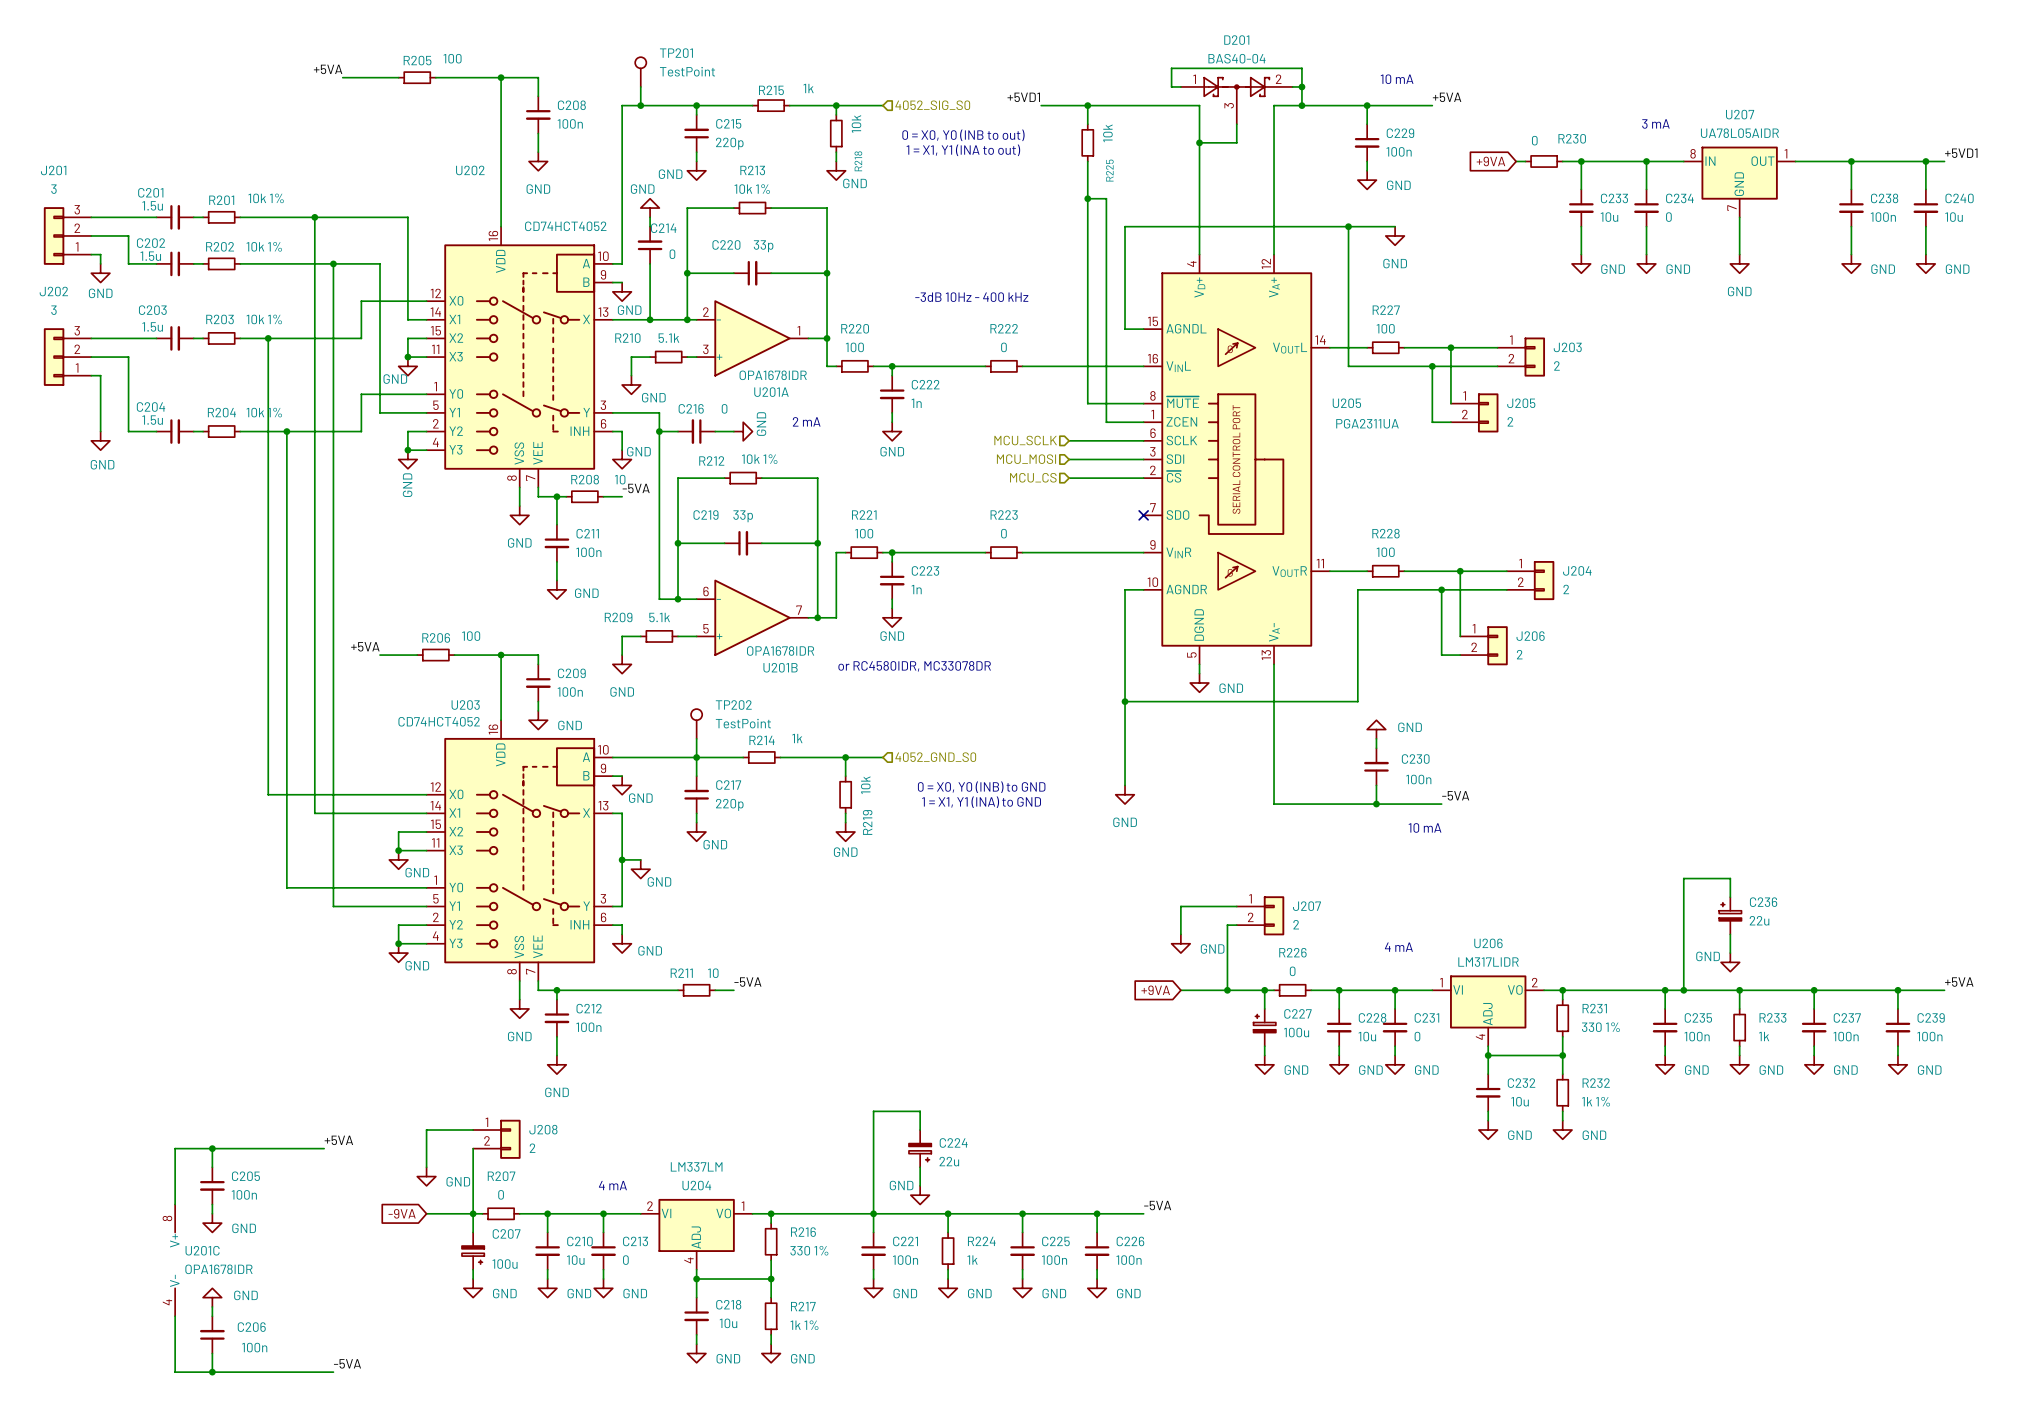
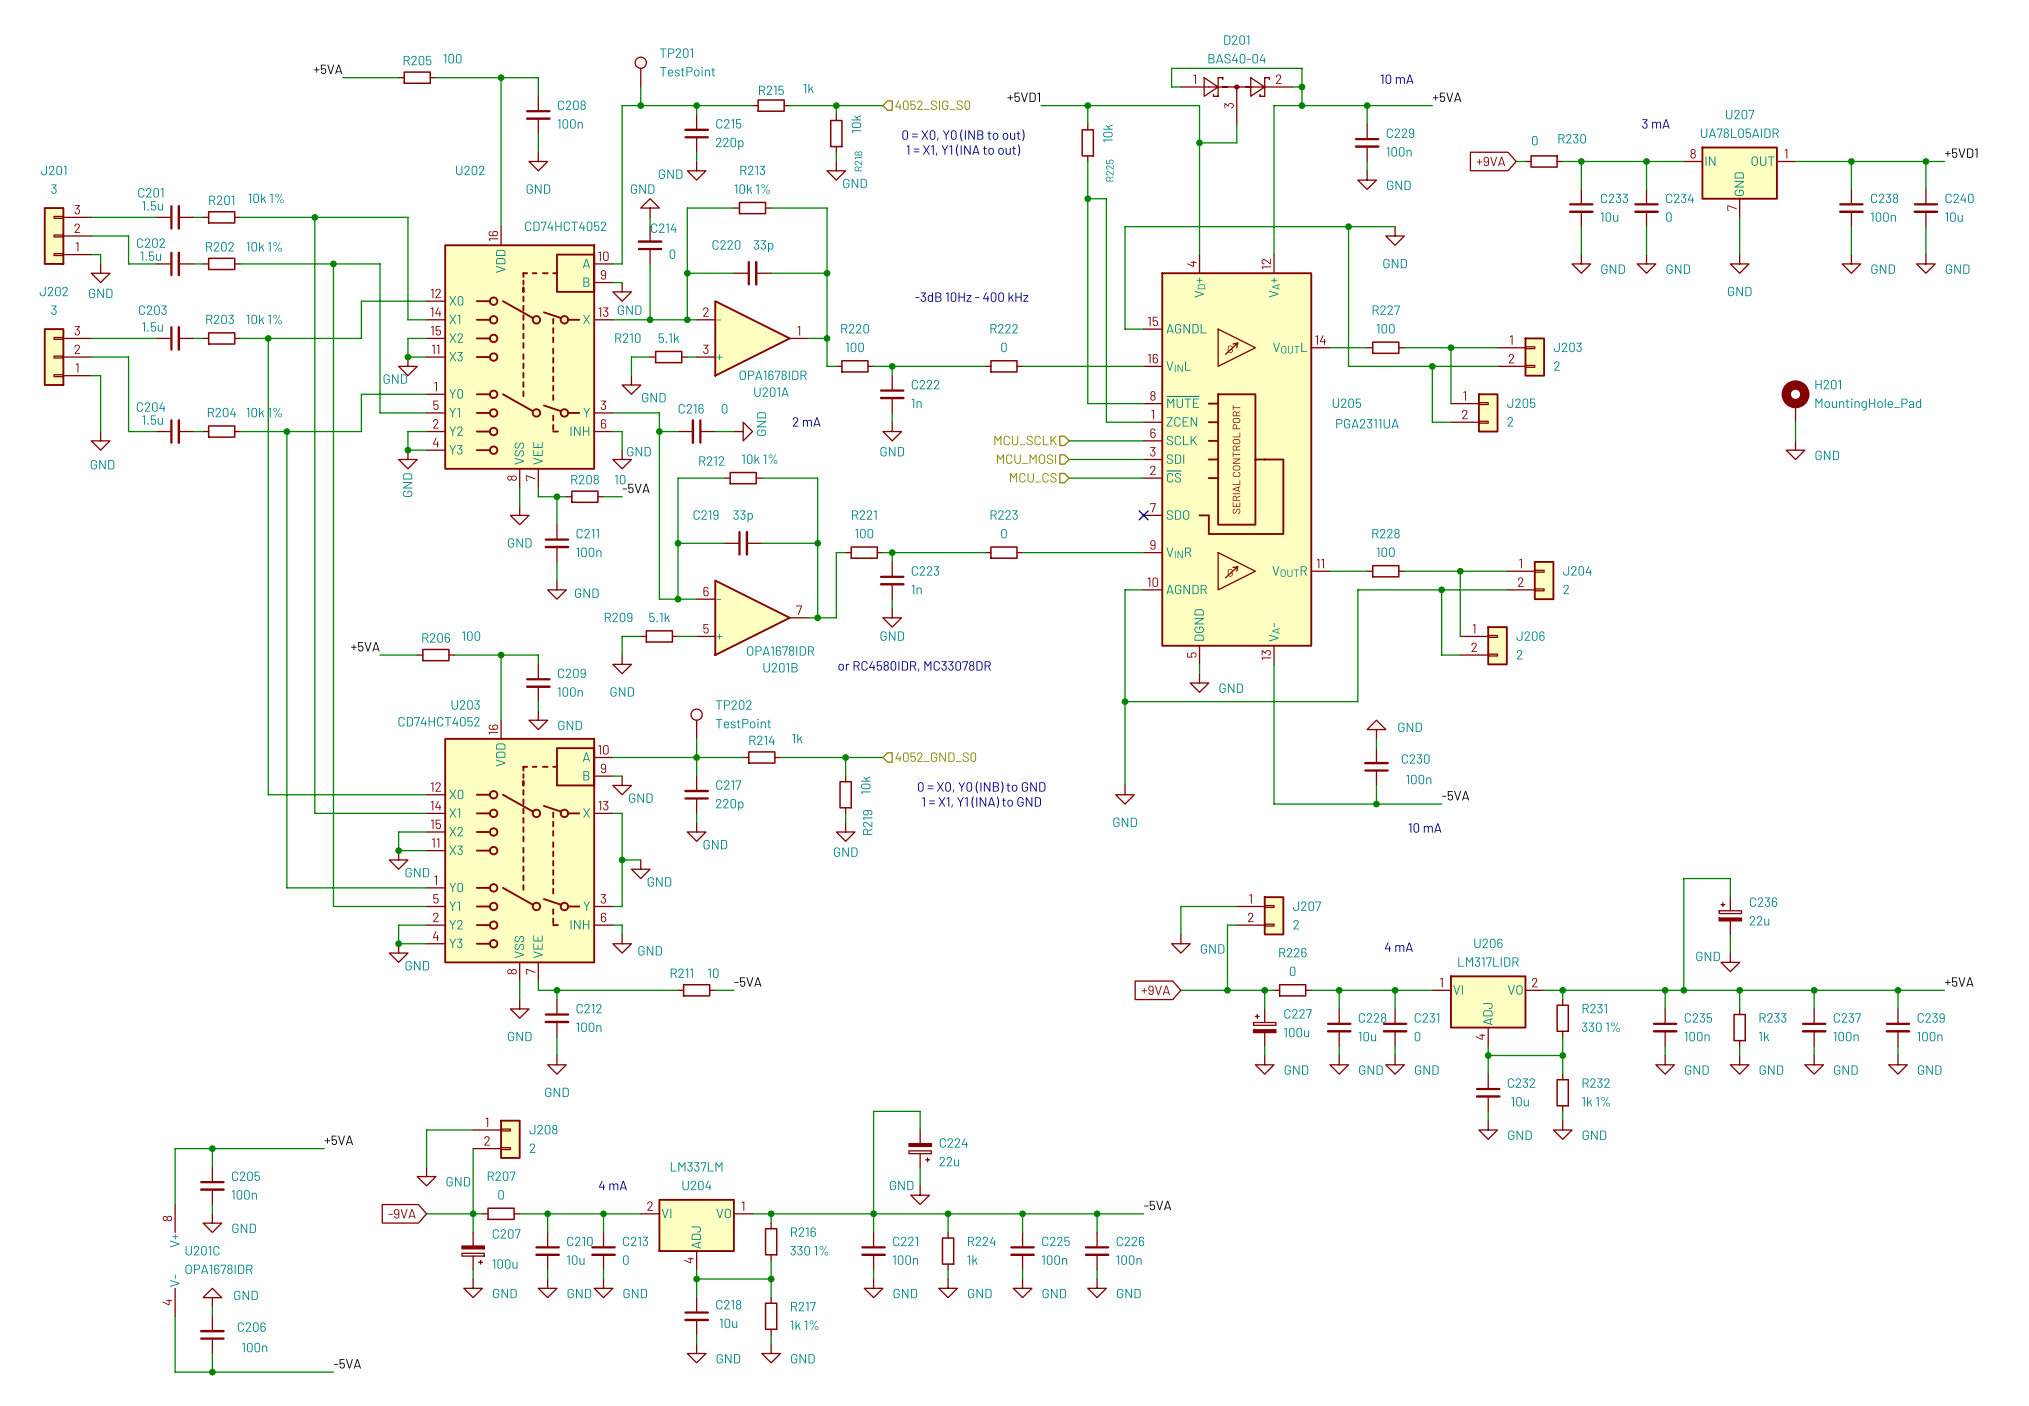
H201: none -> MountingHole_Pad (1795, 401)
wire: none -> (1795, 422) (1795, 440)
power symbol: none -> GND (1795, 450)

